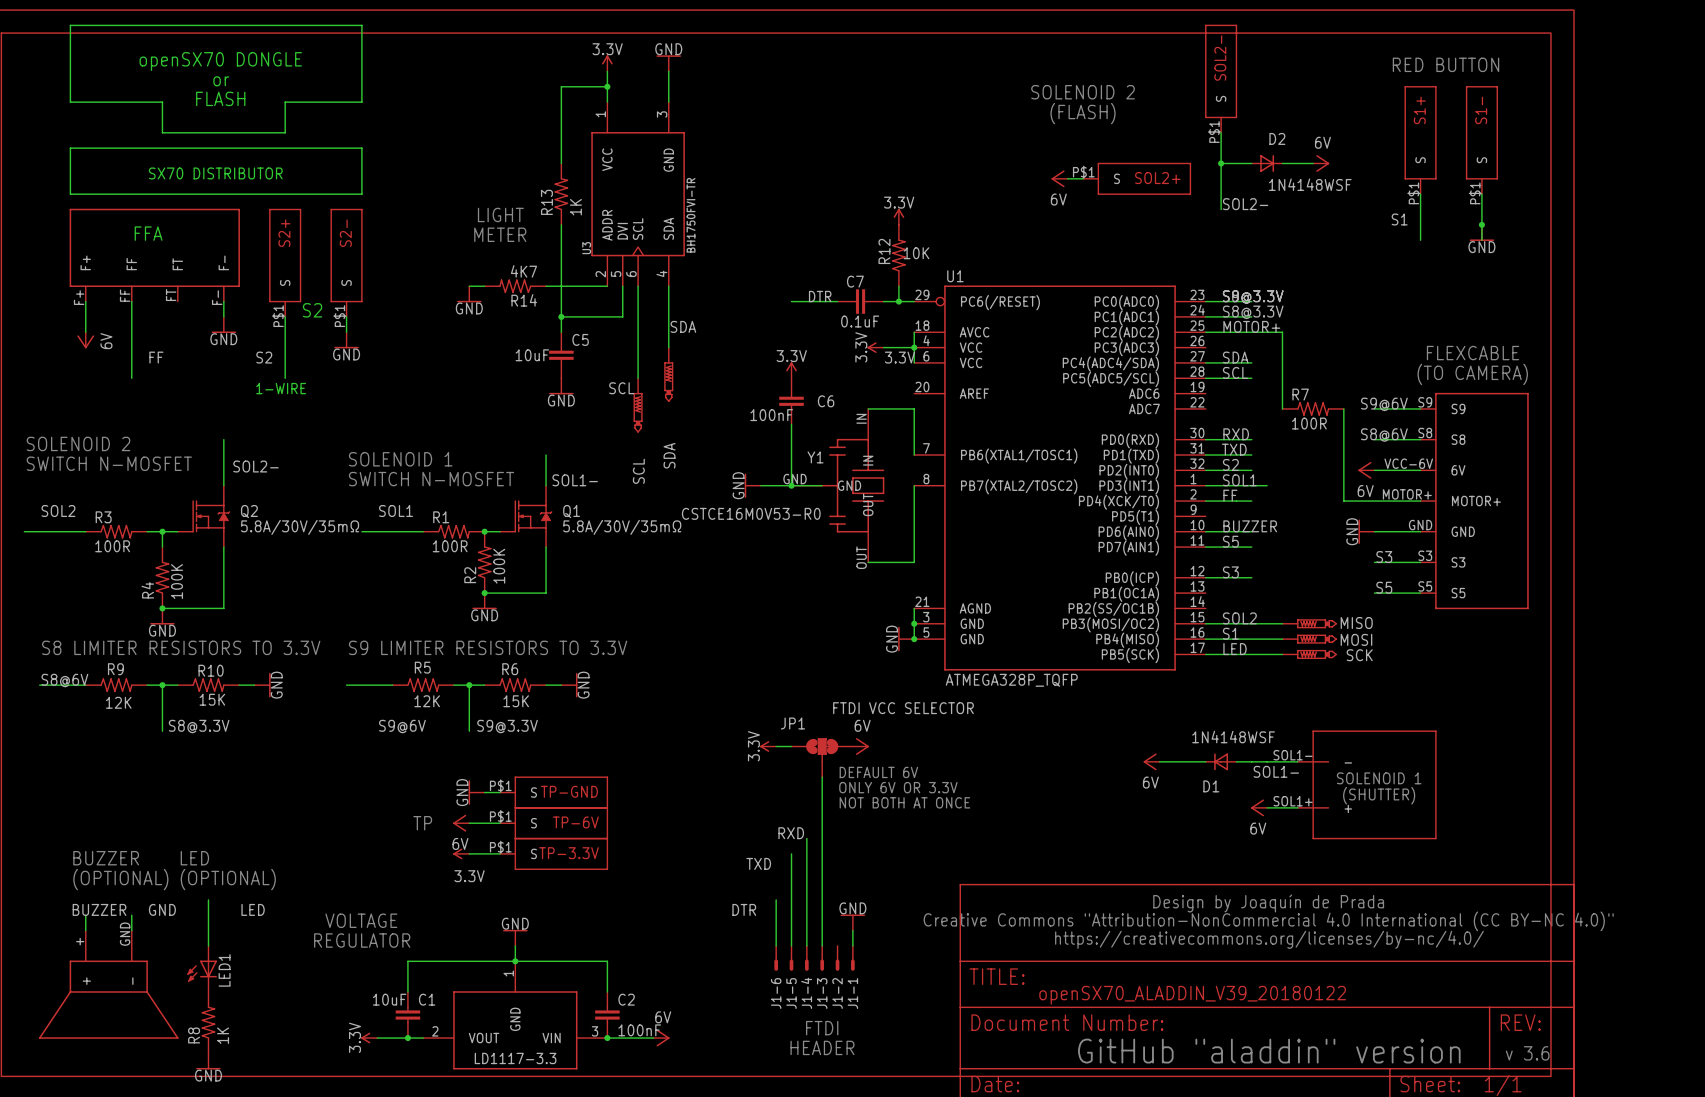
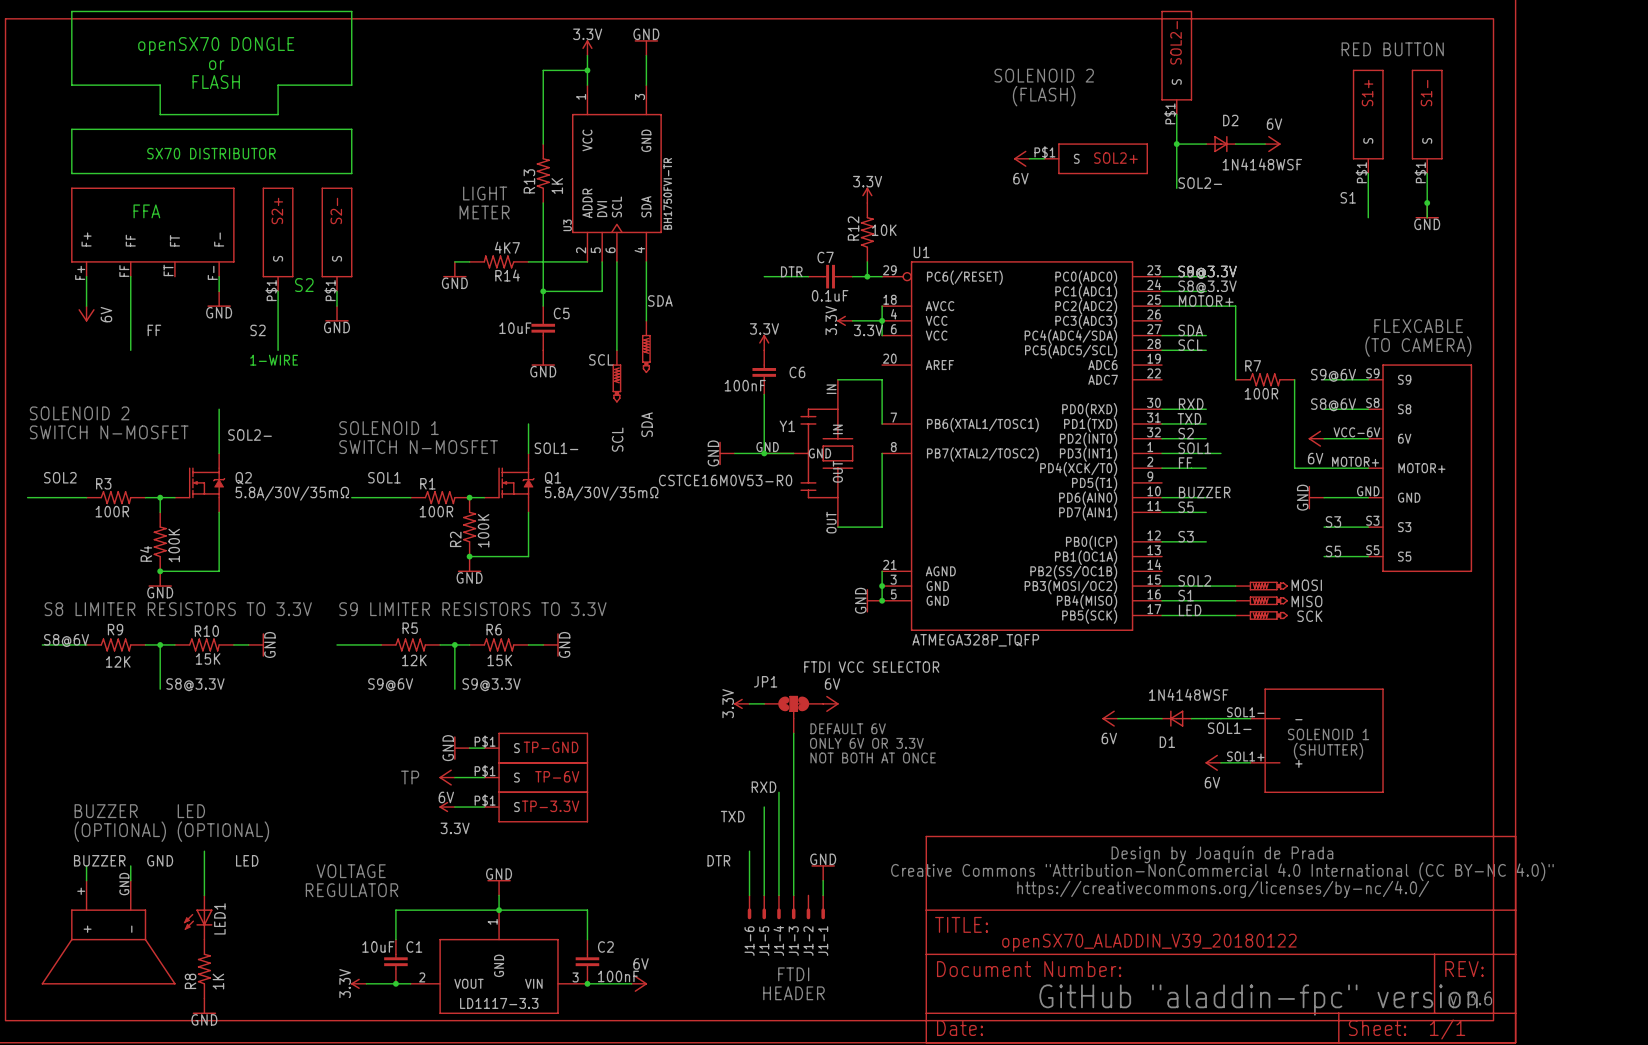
MISO name: MISO (1356, 623) -> MOSI (1306, 585)
MOSI name: MOSI (1356, 639) -> MISO (1306, 601)
text: GitHub "aladdin" version (1269, 1051) -> GitHub "aladdin-fpc" version (1258, 1000)

